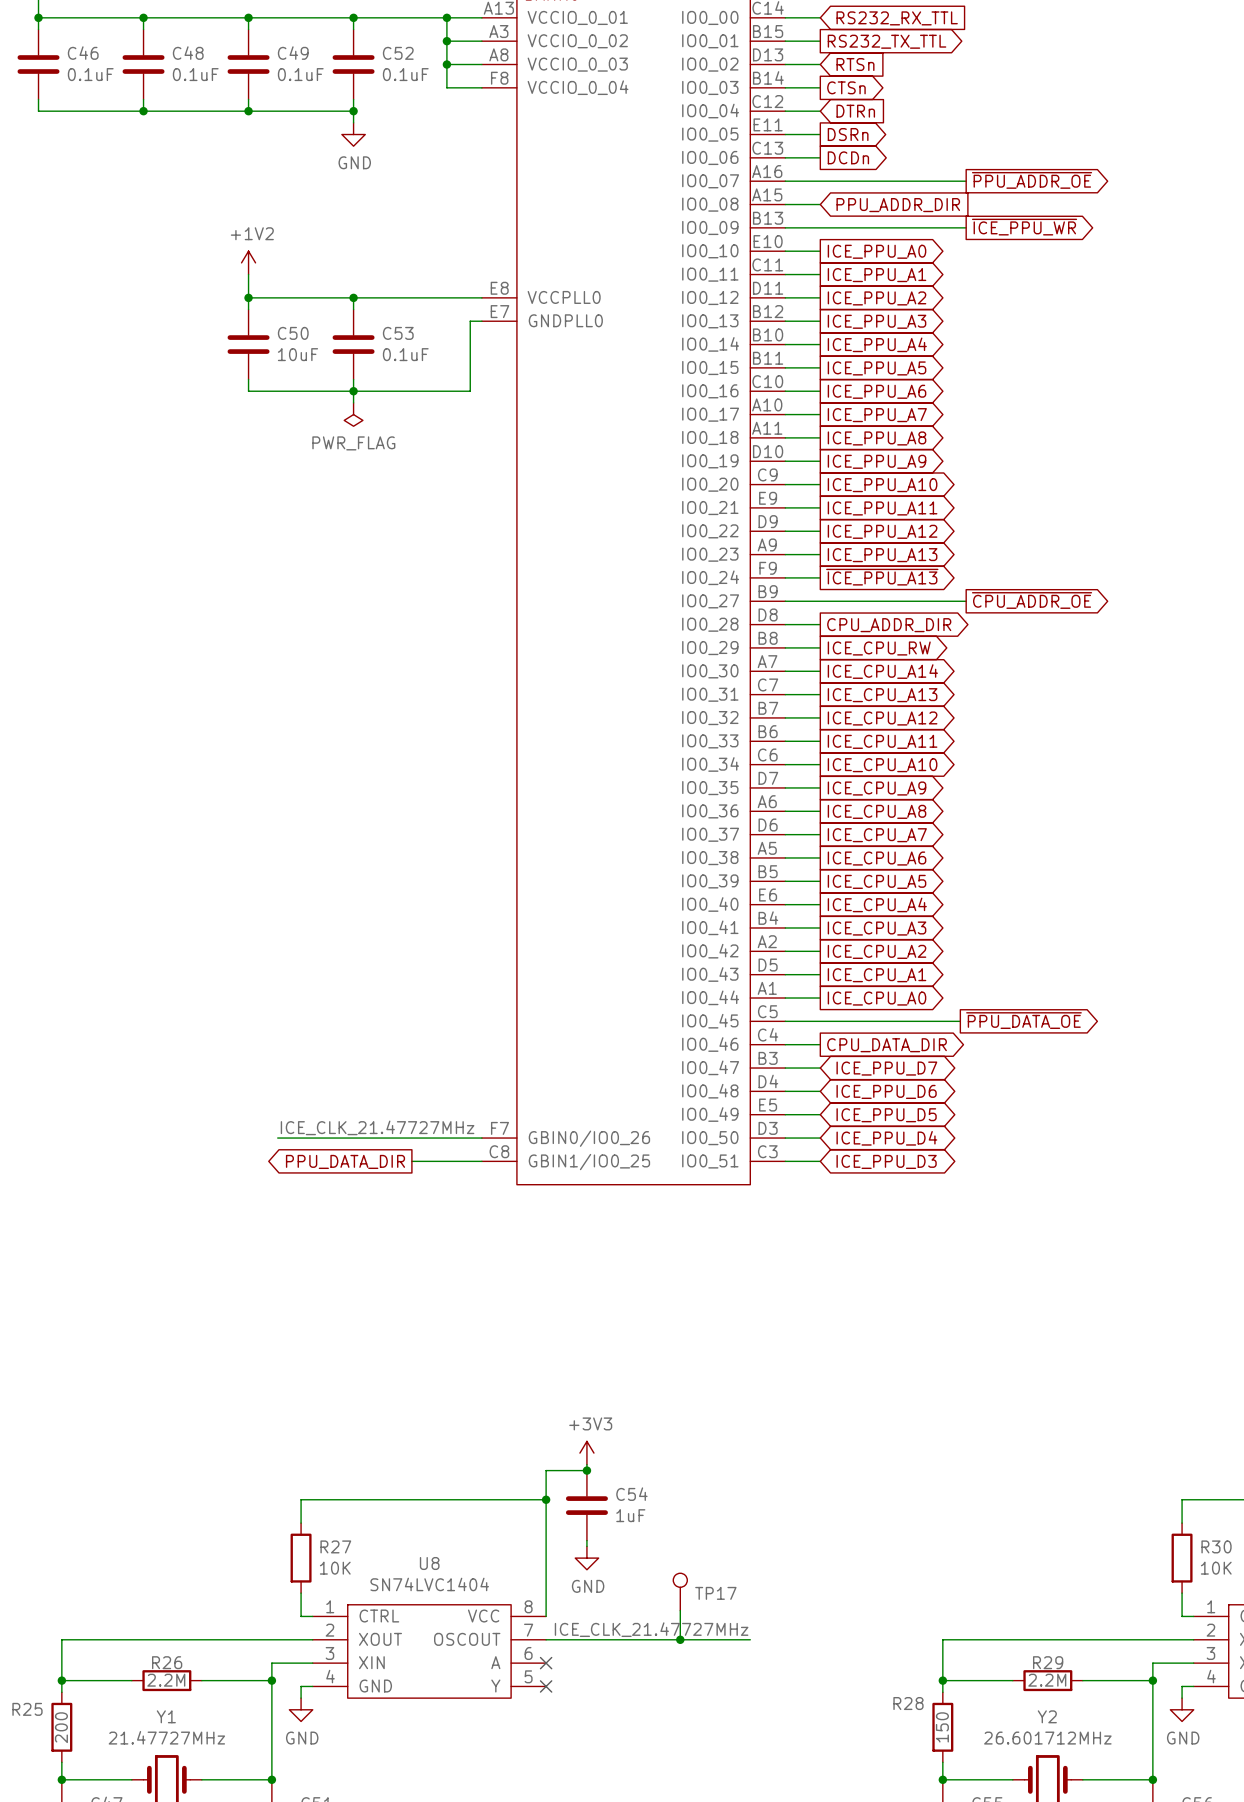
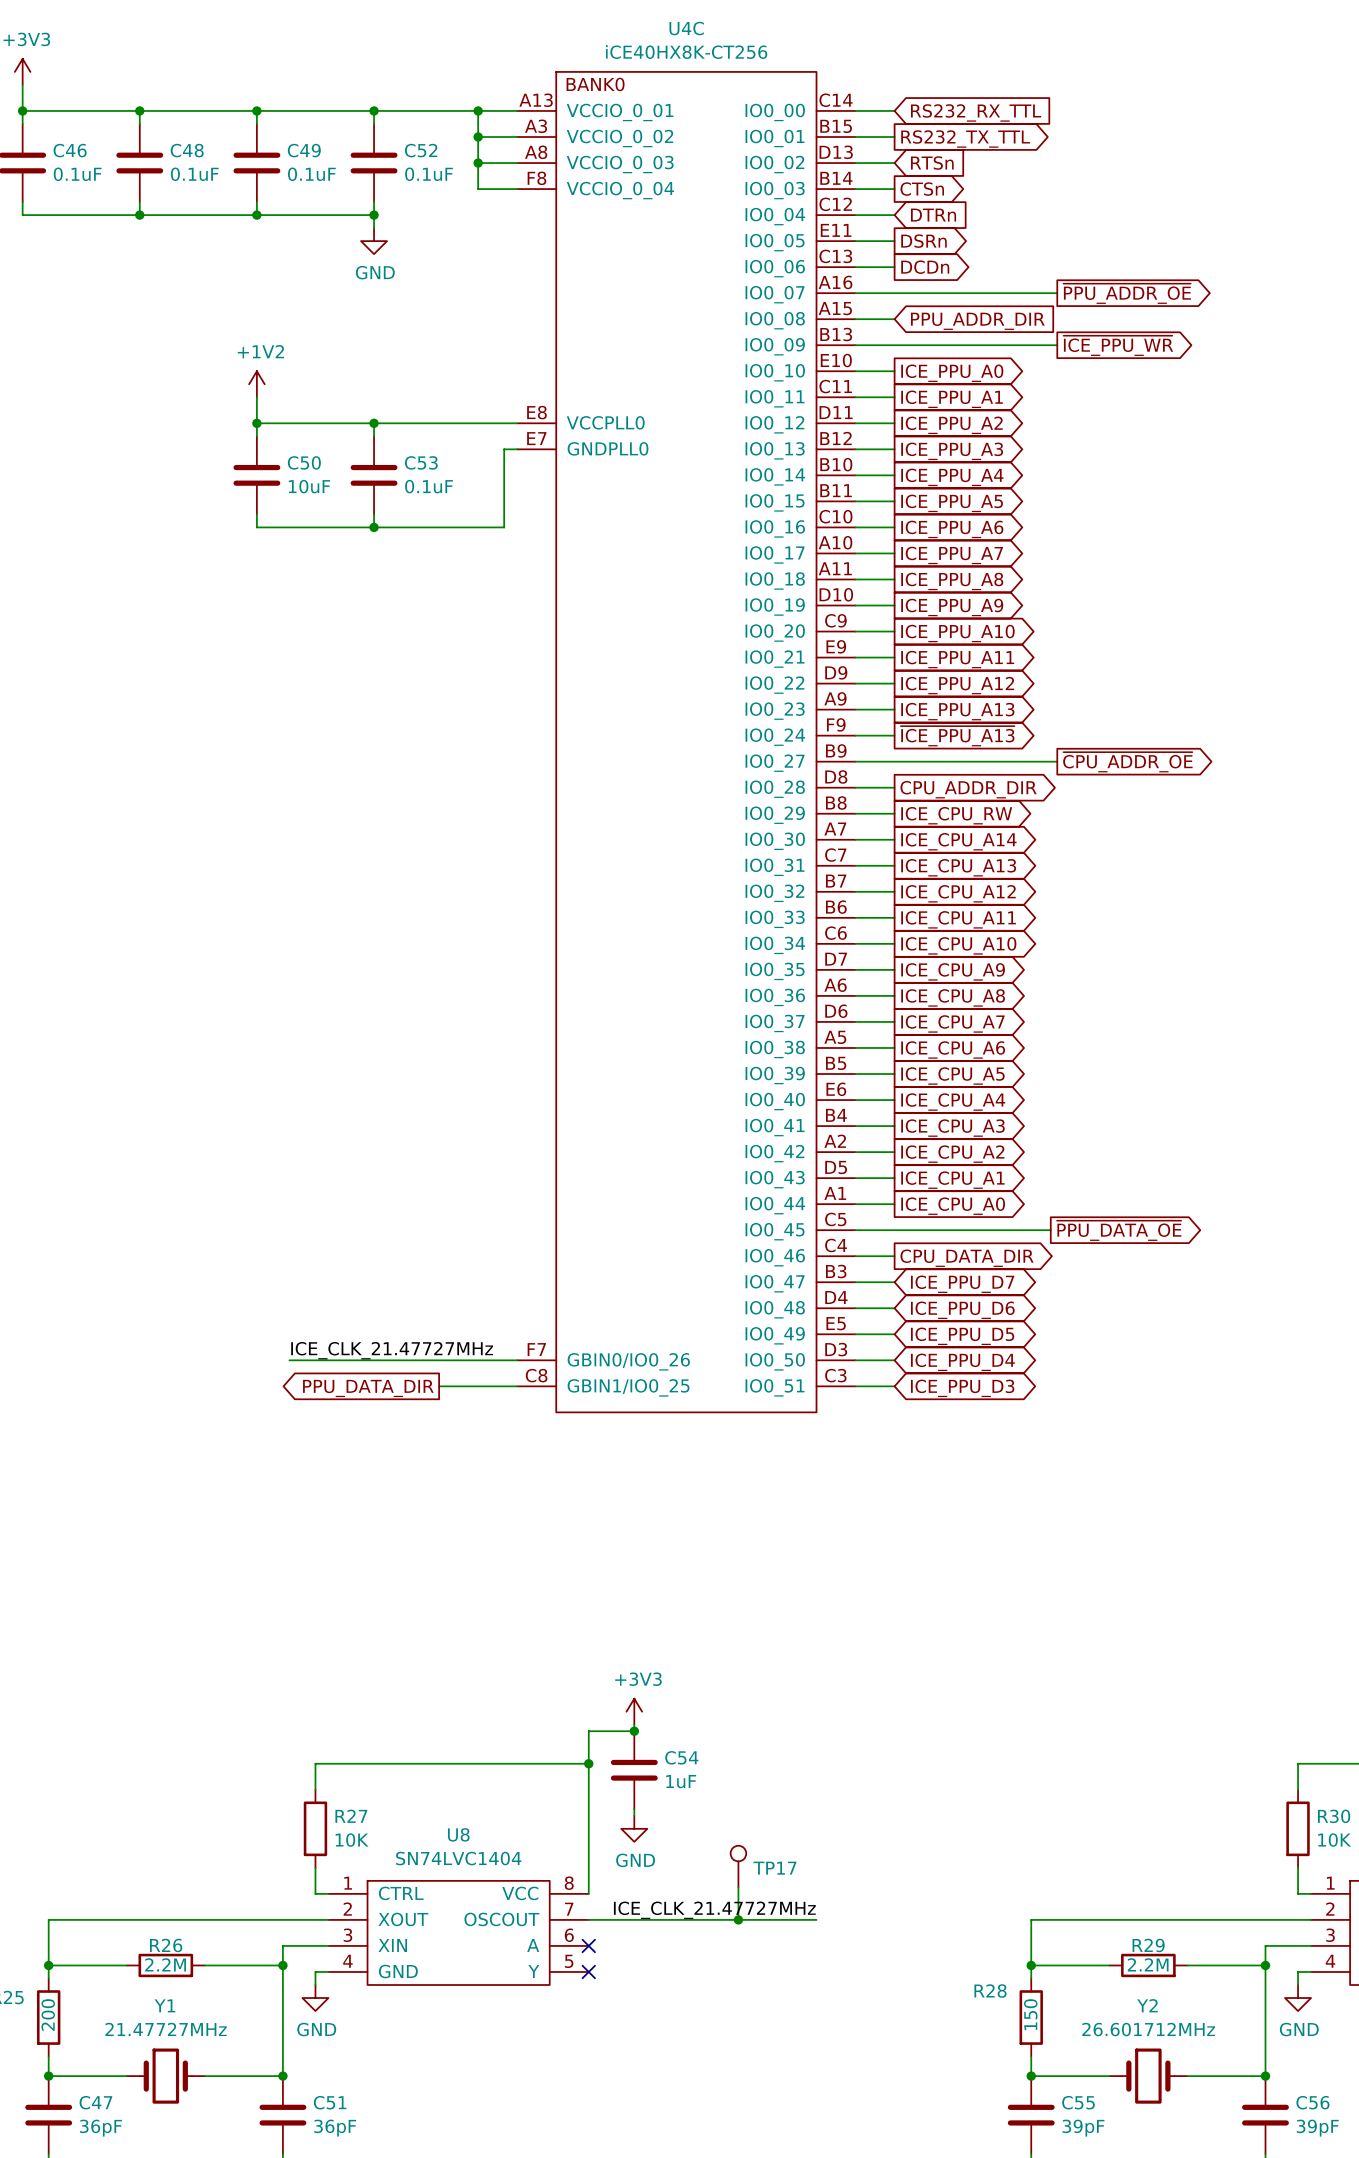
wire: (353, 391) (353, 402) -> none
power symbol: PWR_FLAG (353, 414) -> none

